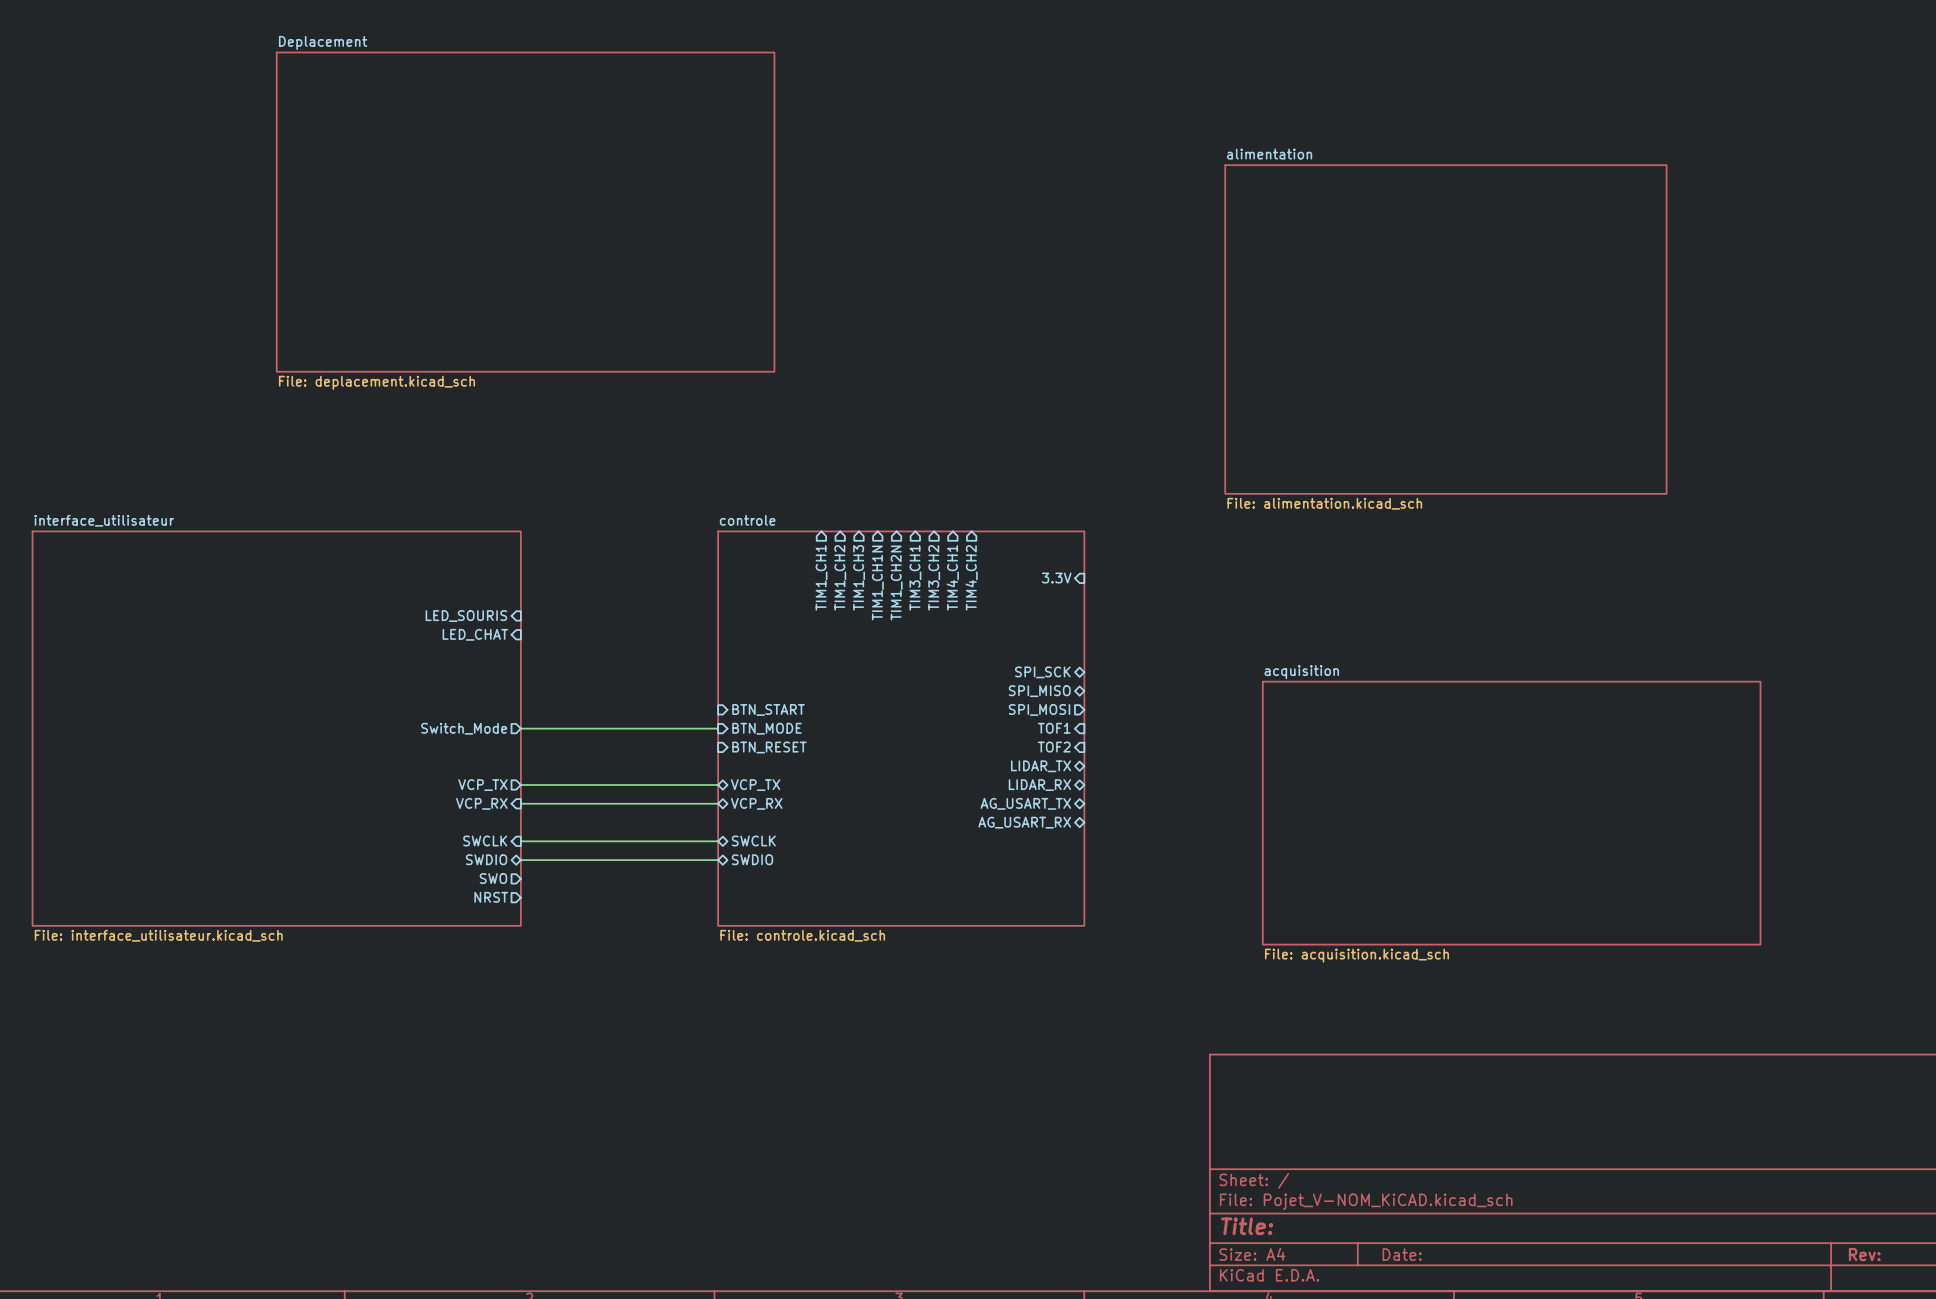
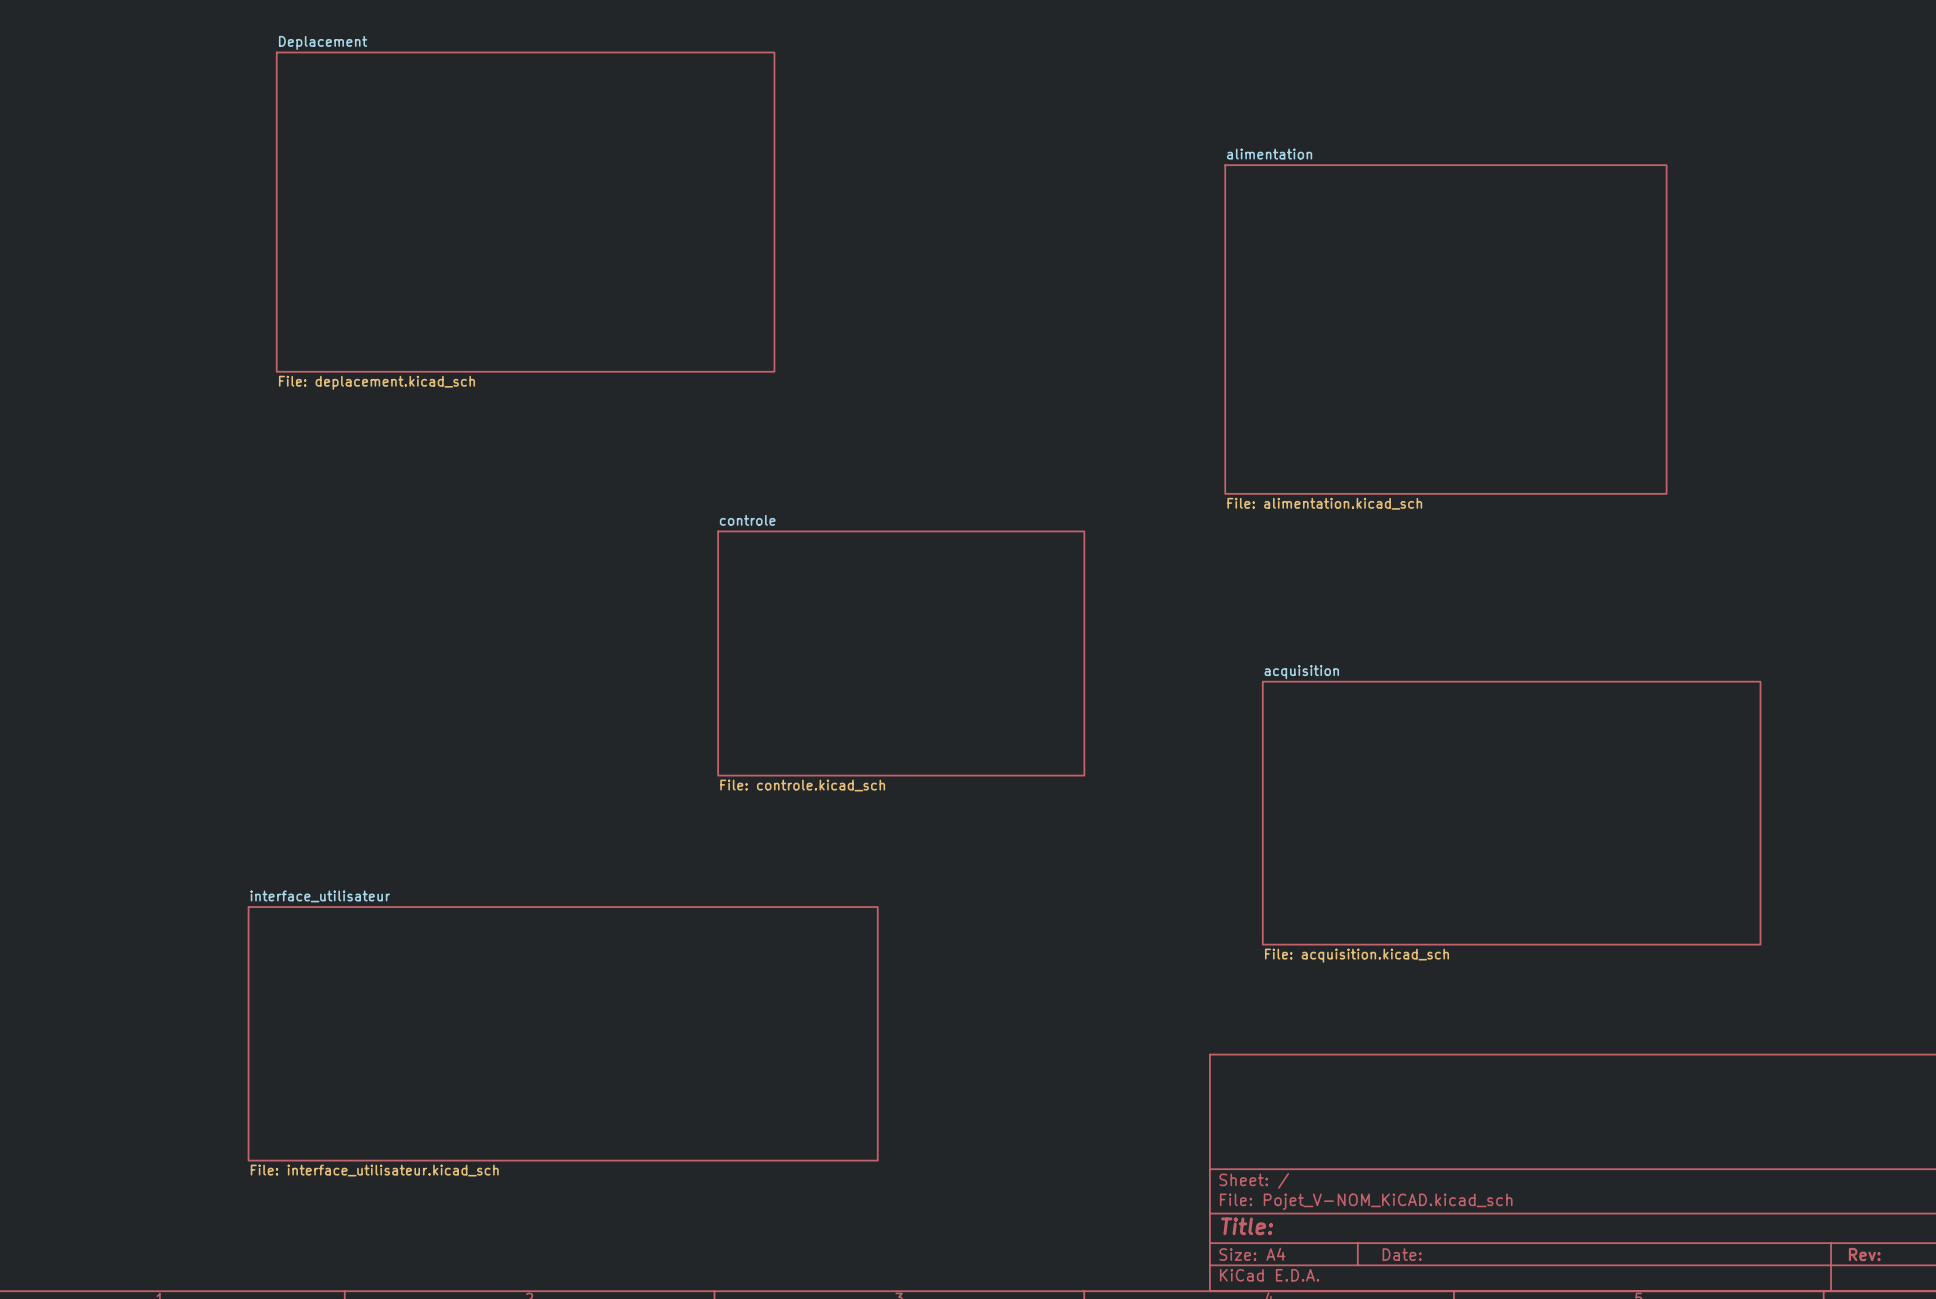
sheet pin: TIM1_CH1 (821, 577) -> none
sheet pin: TIM1_CH2 (840, 577) -> none
sheet pin: TIM1_CH3 (859, 577) -> none
sheet pin: TIM3_CH1 (915, 577) -> none
sheet pin: TIM3_CH2 (934, 577) -> none
sheet pin: TIM4_CH1 (952, 577) -> none
sheet pin: TIM4_CH2 (971, 577) -> none
sheet pin: 3.3V (1056, 578) -> none
sheet pin: TIM1_CH1N (877, 582) -> none
sheet pin: TIM1_CH2N (896, 582) -> none
sheet pin: LED_SOURIS (466, 616) -> none
sheet pin: LED_CHAT (475, 634) -> none
sheet controle: none -> File: controle.kicad_sch (901, 653)
sheet pin: SPI_SCK (1042, 672) -> none
sheet pin: SPI_MISO (1039, 691) -> none
sheet pin: BTN_START (768, 709) -> none
sheet pin: SPI_MOSI (1039, 709) -> none
sheet interface_utilisateur: File: interface_utilisateur.kicad_sch (276, 728) -> none
sheet pin: Switch_Mode (464, 728) -> none
wire: (520, 728) (718, 728) -> none
sheet pin: BTN_MODE (767, 728) -> none
sheet controle: File: controle.kicad_sch (901, 728) -> none
sheet pin: TOF1 (1054, 728) -> none
sheet pin: BTN_RESET (769, 747) -> none
sheet pin: TOF2 (1054, 747) -> none
sheet pin: LIDAR_TX (1041, 766) -> none
wire: (520, 784) (718, 784) -> none
sheet pin: VCP_TX (482, 785) -> none
sheet pin: VCP_TX (755, 785) -> none
sheet pin: LIDAR_RX (1039, 785) -> none
sheet pin: VCP_RX (481, 803) -> none
wire: (520, 803) (718, 803) -> none
sheet pin: VCP_RX (756, 803) -> none
sheet pin: AG_USART_TX (1025, 803) -> none
sheet pin: AG_USART_RX (1024, 822) -> none
sheet pin: SWCLK (485, 840) -> none
sheet pin: SWCLK (753, 840) -> none
wire: (520, 841) (718, 841) -> none
sheet pin: SWDIO (486, 859) -> none
sheet pin: SWDIO (752, 859) -> none
wire: (520, 860) (718, 860) -> none
sheet pin: SWO (493, 878) -> none
sheet pin: NRST (491, 897) -> none
sheet interface_utilisateur: none -> File: interface_utilisateur.kicad_sch (563, 1033)

